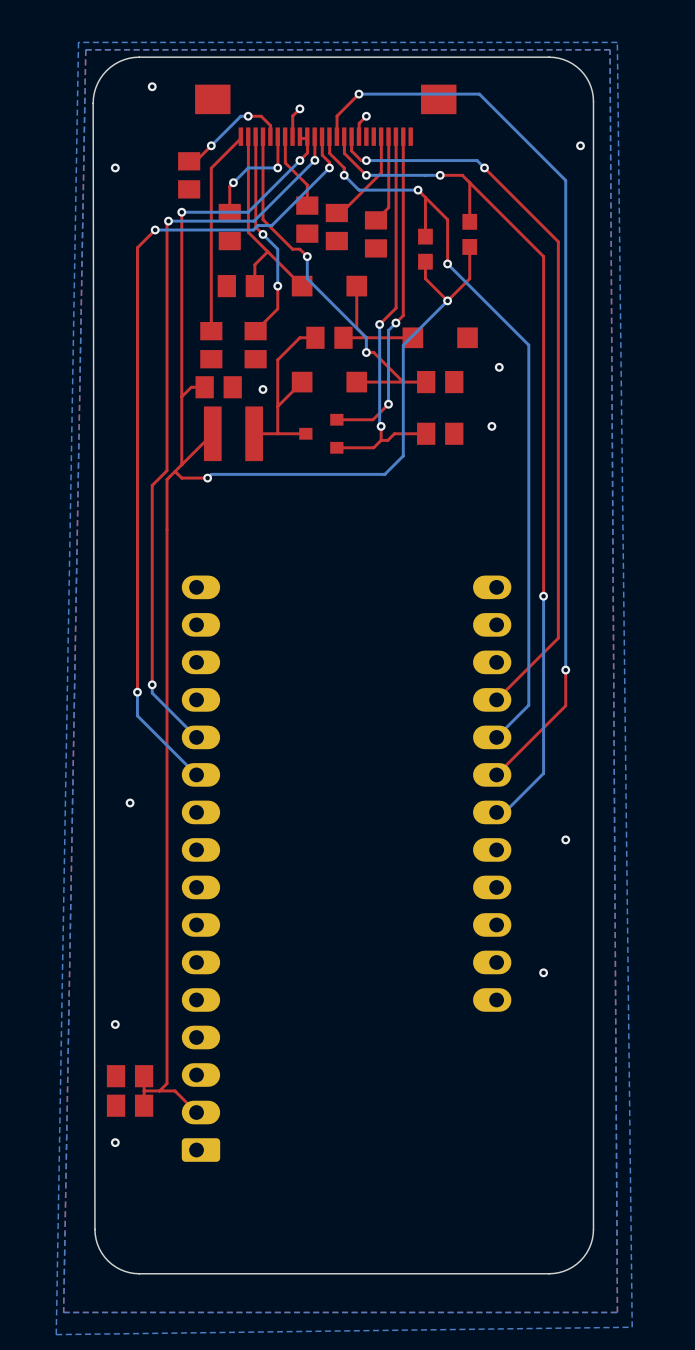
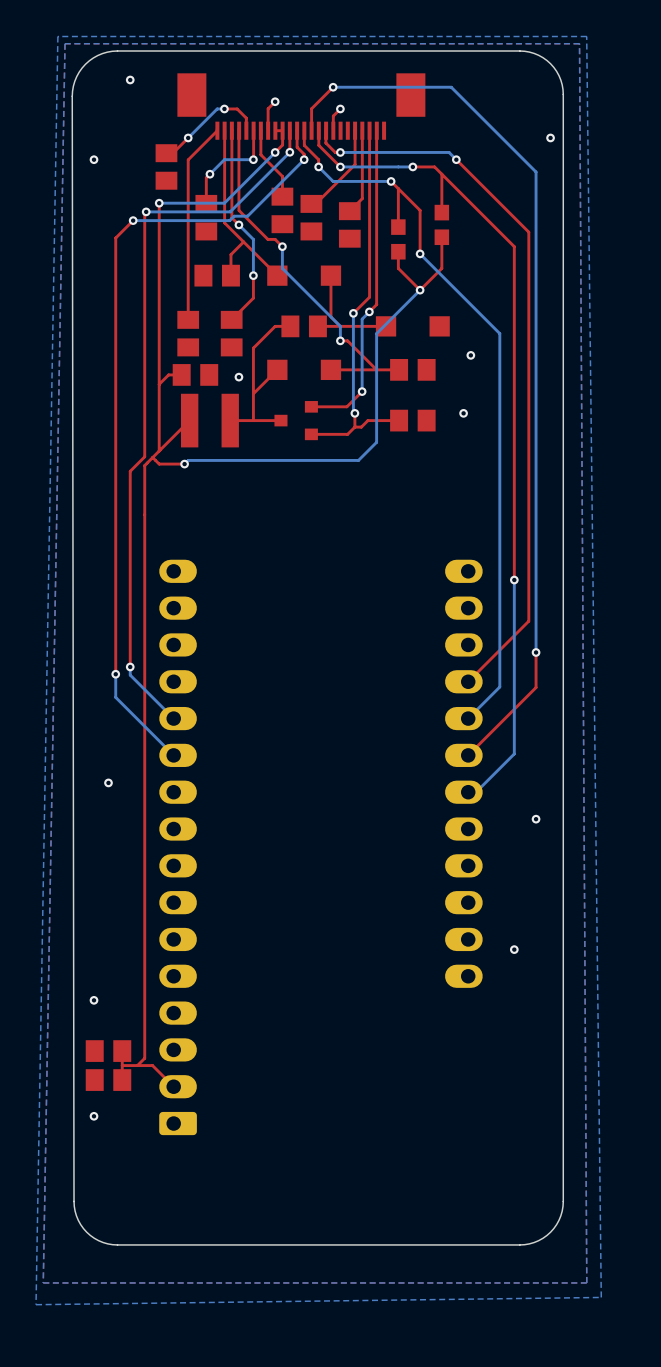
part footprint: [195, 84, 457, 146] -> [177, 73, 426, 140]

